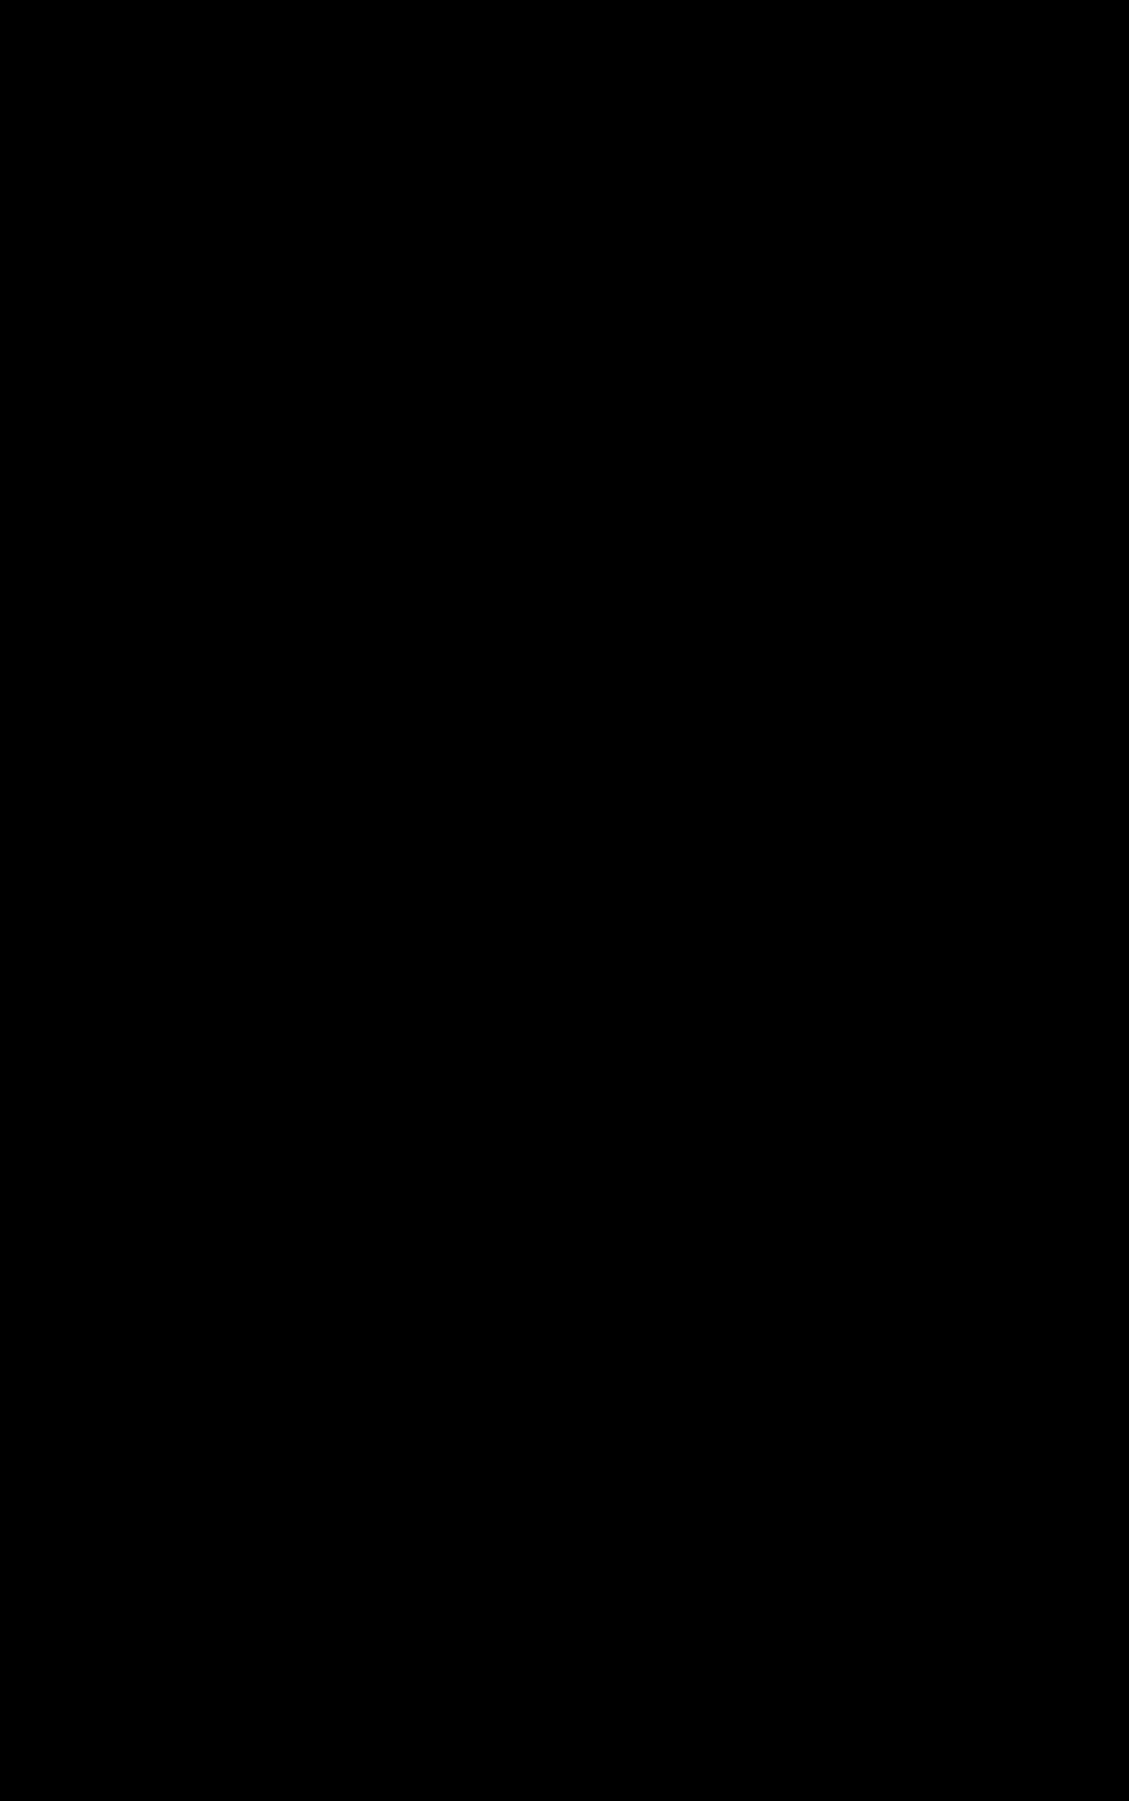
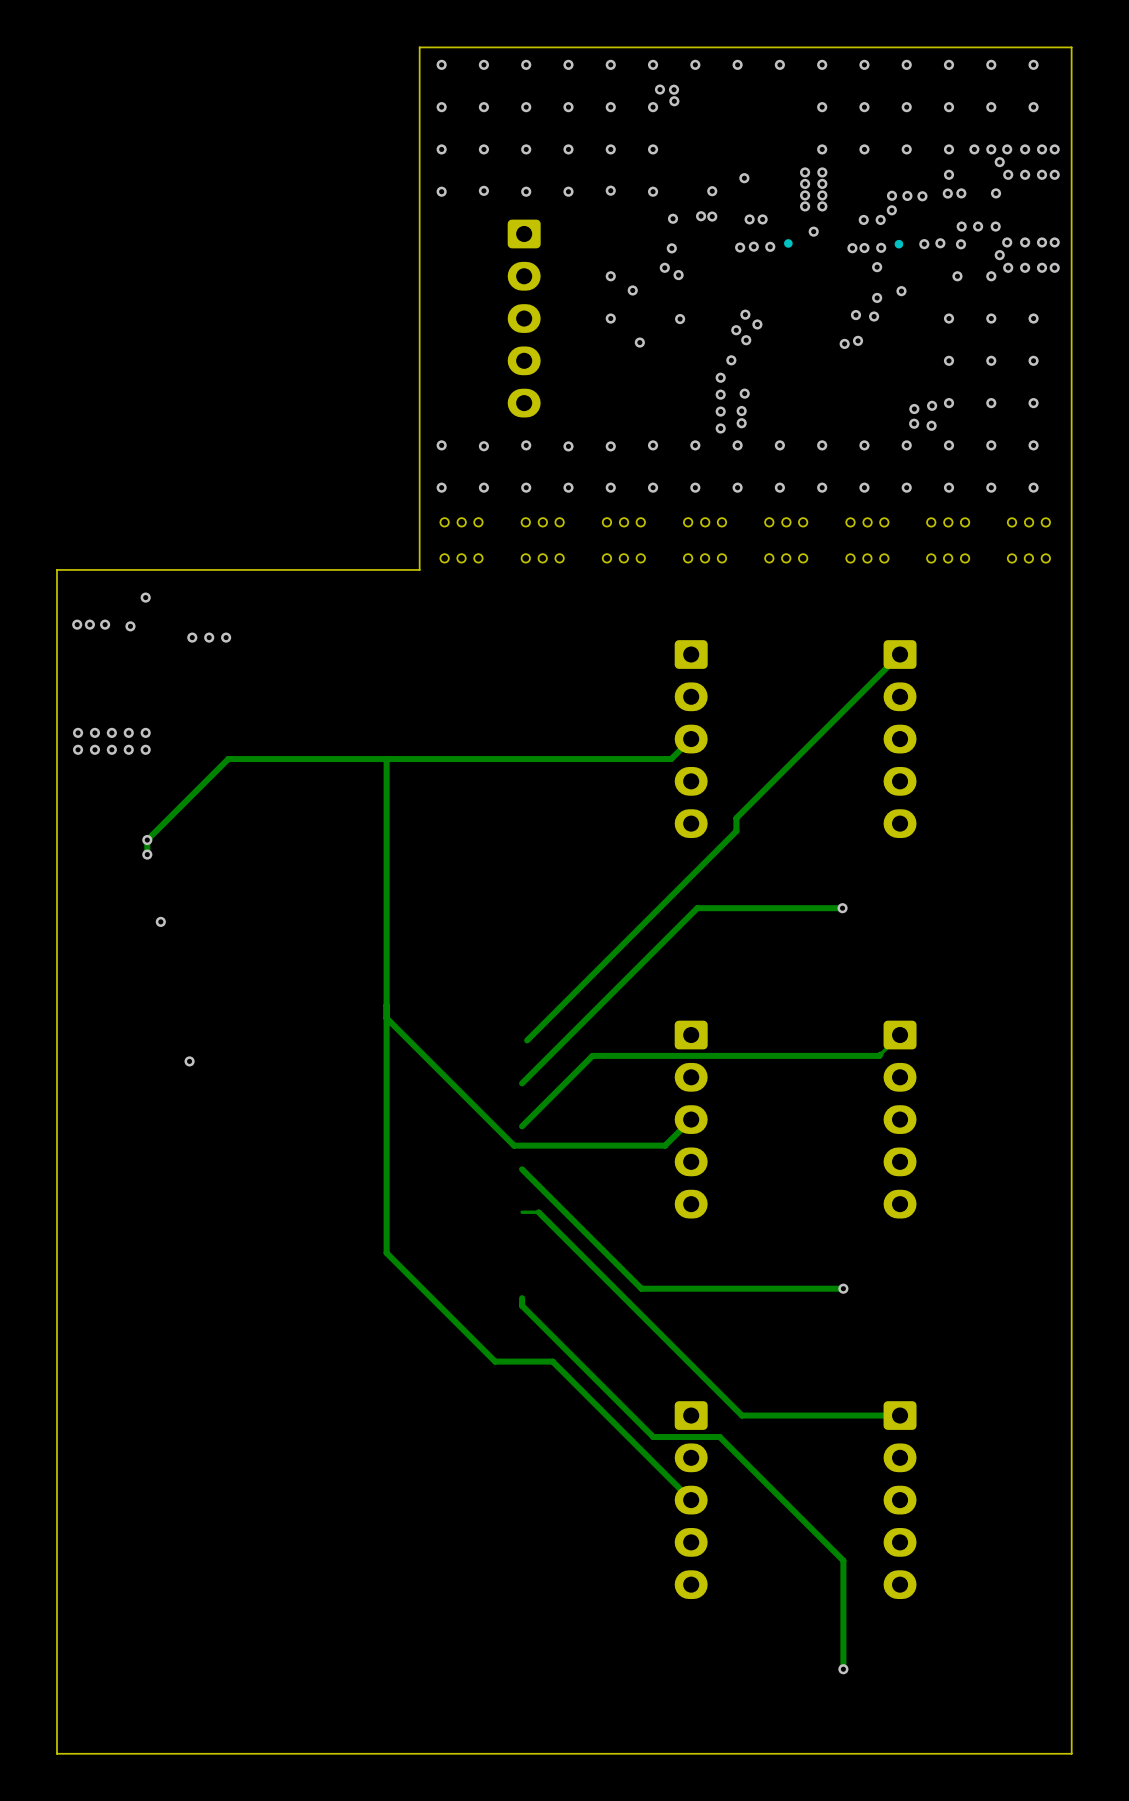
board edge: none -> (1071, 47) (1071, 1753) (56, 1753) (56, 569) (419, 569) (419, 47) (1071, 47)
via: none -> (441, 64)
via: none -> (483, 64)
via: none -> (526, 64)
via: none -> (568, 64)
via: none -> (610, 64)
via: none -> (653, 64)
via: none -> (695, 64)
via: none -> (737, 64)
via: none -> (779, 64)
via: none -> (822, 64)
via: none -> (864, 64)
via: none -> (906, 64)
via: none -> (949, 64)
via: none -> (991, 64)
via: none -> (1033, 64)
via: none -> (659, 89)
via: none -> (674, 89)
via: none -> (674, 101)
via: none -> (441, 107)
via: none -> (483, 107)
via: none -> (526, 107)
via: none -> (568, 107)
via: none -> (610, 107)
via: none -> (653, 107)
via: none -> (822, 107)
via: none -> (864, 107)
via: none -> (906, 107)
via: none -> (949, 107)
via: none -> (991, 107)
via: none -> (1033, 107)
via: none -> (441, 149)
via: none -> (483, 149)
via: none -> (526, 149)
via: none -> (568, 149)
via: none -> (610, 149)
via: none -> (653, 149)
via: none -> (822, 149)
via: none -> (864, 149)
via: none -> (906, 149)
via: none -> (949, 149)
via: none -> (974, 149)
via: none -> (991, 149)
via: none -> (1007, 149)
via: none -> (1025, 149)
via: none -> (1042, 149)
via: none -> (1054, 149)
via: none -> (999, 162)
via: none -> (805, 172)
via: none -> (822, 172)
via: none -> (949, 174)
via: none -> (1008, 174)
via: none -> (1025, 174)
via: none -> (1042, 174)
via: none -> (1054, 174)
via: none -> (744, 178)
via: none -> (805, 183)
via: none -> (822, 183)
via: none -> (483, 190)
via: none -> (610, 190)
via: none -> (441, 191)
via: none -> (526, 191)
via: none -> (568, 191)
via: none -> (653, 191)
via: none -> (712, 191)
via: none -> (947, 193)
via: none -> (961, 193)
via: none -> (996, 193)
via: none -> (805, 195)
via: none -> (822, 195)
via: none -> (892, 195)
via: none -> (907, 195)
via: none -> (922, 196)
via: none -> (805, 206)
via: none -> (822, 206)
via: none -> (891, 210)
via: none -> (701, 216)
via: none -> (712, 216)
via: none -> (673, 218)
via: none -> (749, 219)
via: none -> (762, 219)
via: none -> (863, 219)
via: none -> (880, 219)
via: none -> (961, 226)
via: none -> (978, 226)
via: none -> (995, 226)
via: none -> (813, 231)
via: none -> (1007, 242)
via: none -> (1025, 242)
via: none -> (1042, 242)
via: none -> (1054, 242)
part: none -> (788, 243)
via: none -> (940, 243)
part: none -> (898, 244)
via: none -> (924, 244)
via: none -> (961, 244)
via: none -> (753, 246)
via: none -> (770, 246)
via: none -> (740, 247)
via: none -> (881, 247)
via: none -> (671, 248)
via: none -> (852, 248)
via: none -> (864, 248)
via: none -> (999, 255)
via: none -> (664, 267)
via: none -> (877, 267)
via: none -> (1008, 267)
via: none -> (1025, 267)
via: none -> (1042, 267)
via: none -> (1054, 267)
via: none -> (678, 275)
via: none -> (610, 276)
via: none -> (957, 276)
via: none -> (991, 276)
via: none -> (632, 290)
via: none -> (901, 291)
via: none -> (877, 297)
via: none -> (745, 314)
via: none -> (855, 315)
via: none -> (874, 316)
part: none -> (524, 318)
via: none -> (610, 318)
via: none -> (949, 318)
via: none -> (991, 318)
via: none -> (1033, 318)
via: none -> (680, 319)
via: none -> (757, 324)
via: none -> (736, 330)
via: none -> (746, 340)
via: none -> (858, 340)
via: none -> (639, 342)
via: none -> (844, 343)
via: none -> (731, 360)
via: none -> (949, 360)
via: none -> (991, 360)
via: none -> (1033, 360)
via: none -> (720, 377)
via: none -> (744, 393)
via: none -> (720, 394)
via: none -> (949, 403)
via: none -> (991, 403)
via: none -> (1033, 403)
via: none -> (932, 405)
via: none -> (914, 409)
via: none -> (720, 411)
via: none -> (741, 411)
via: none -> (741, 423)
via: none -> (914, 423)
via: none -> (931, 425)
via: none -> (720, 428)
via: none -> (441, 445)
via: none -> (526, 445)
via: none -> (653, 445)
via: none -> (695, 445)
via: none -> (737, 445)
via: none -> (779, 445)
via: none -> (822, 445)
via: none -> (864, 445)
via: none -> (906, 445)
via: none -> (949, 445)
via: none -> (991, 445)
via: none -> (1033, 445)
via: none -> (483, 446)
via: none -> (568, 446)
via: none -> (610, 446)
via: none -> (441, 487)
via: none -> (483, 487)
via: none -> (526, 487)
via: none -> (568, 487)
via: none -> (610, 487)
via: none -> (653, 487)
via: none -> (695, 487)
via: none -> (737, 487)
via: none -> (779, 487)
via: none -> (822, 487)
via: none -> (864, 487)
via: none -> (906, 487)
via: none -> (949, 487)
via: none -> (991, 487)
via: none -> (1033, 487)
part: none -> (461, 540)
part: none -> (542, 540)
part: none -> (623, 540)
part: none -> (705, 540)
part: none -> (786, 540)
part: none -> (867, 540)
part: none -> (948, 540)
part: none -> (1028, 540)
via: none -> (145, 597)
via: none -> (77, 624)
via: none -> (89, 624)
via: none -> (105, 624)
via: none -> (130, 626)
via: none -> (192, 637)
via: none -> (209, 637)
via: none -> (226, 637)
track: none -> (900, 654) (736, 818) (736, 831) (527, 1040)
via: none -> (78, 732)
via: none -> (94, 732)
via: none -> (111, 732)
via: none -> (128, 732)
via: none -> (145, 732)
track: none -> (691, 739) (671, 759) (228, 759) (147, 840) (147, 854)
part: none -> (691, 739)
part: none -> (900, 739)
via: none -> (78, 749)
via: none -> (94, 749)
via: none -> (111, 749)
via: none -> (128, 749)
via: none -> (145, 749)
track: none -> (386, 759) (386, 1253) (495, 1361) (552, 1361) (691, 1500)
via: none -> (147, 840)
via: none -> (147, 854)
track: none -> (842, 908) (697, 908) (522, 1083)
via: none -> (842, 908)
via: none -> (160, 921)
track: none -> (386, 1018) (514, 1145) (665, 1145) (691, 1119)
track: none -> (900, 1035) (879, 1055) (592, 1055) (522, 1126)
via: none -> (189, 1061)
part: none -> (691, 1119)
part: none -> (900, 1119)
track: none -> (522, 1169) (641, 1288) (843, 1288)
track: none -> (522, 1212) (538, 1212) (741, 1415) (900, 1415)
via: none -> (843, 1288)
track: none -> (522, 1298) (522, 1305) (653, 1437) (719, 1437) (843, 1560) (843, 1669)
part: none -> (691, 1500)
part: none -> (900, 1500)
via: none -> (843, 1669)

